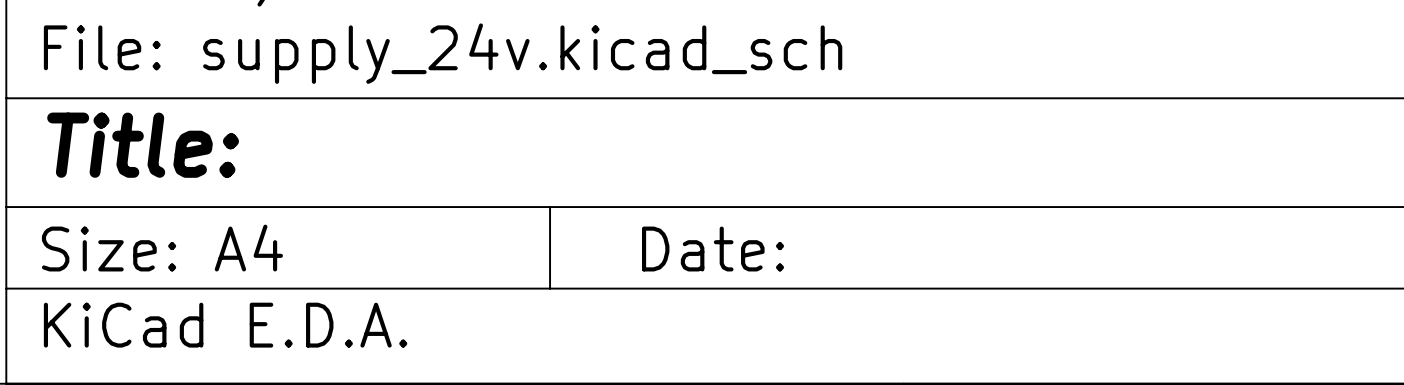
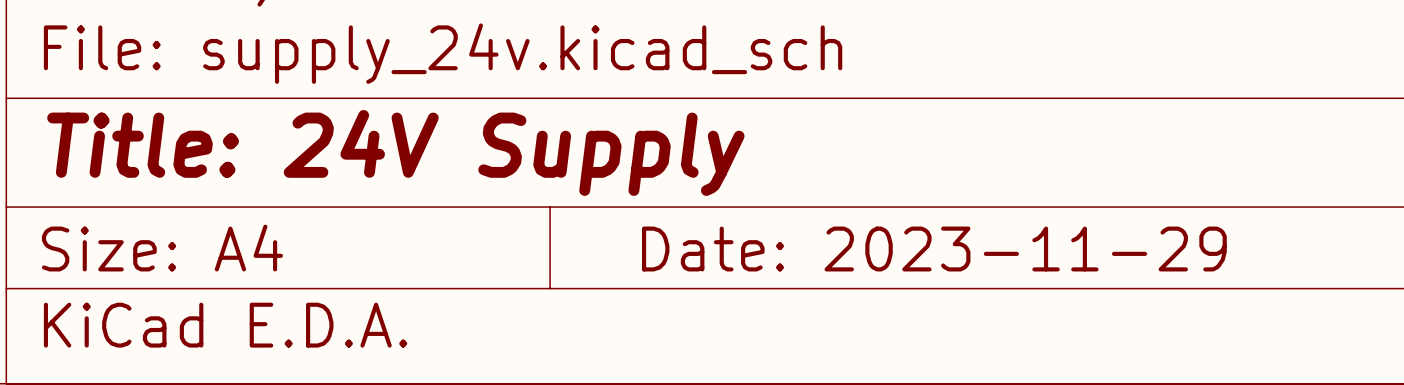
title block: Title: (143, 145) -> Title: 24V Supply (395, 152)
title block: Date: (713, 249) -> Date: 2023-11-29 (934, 249)

